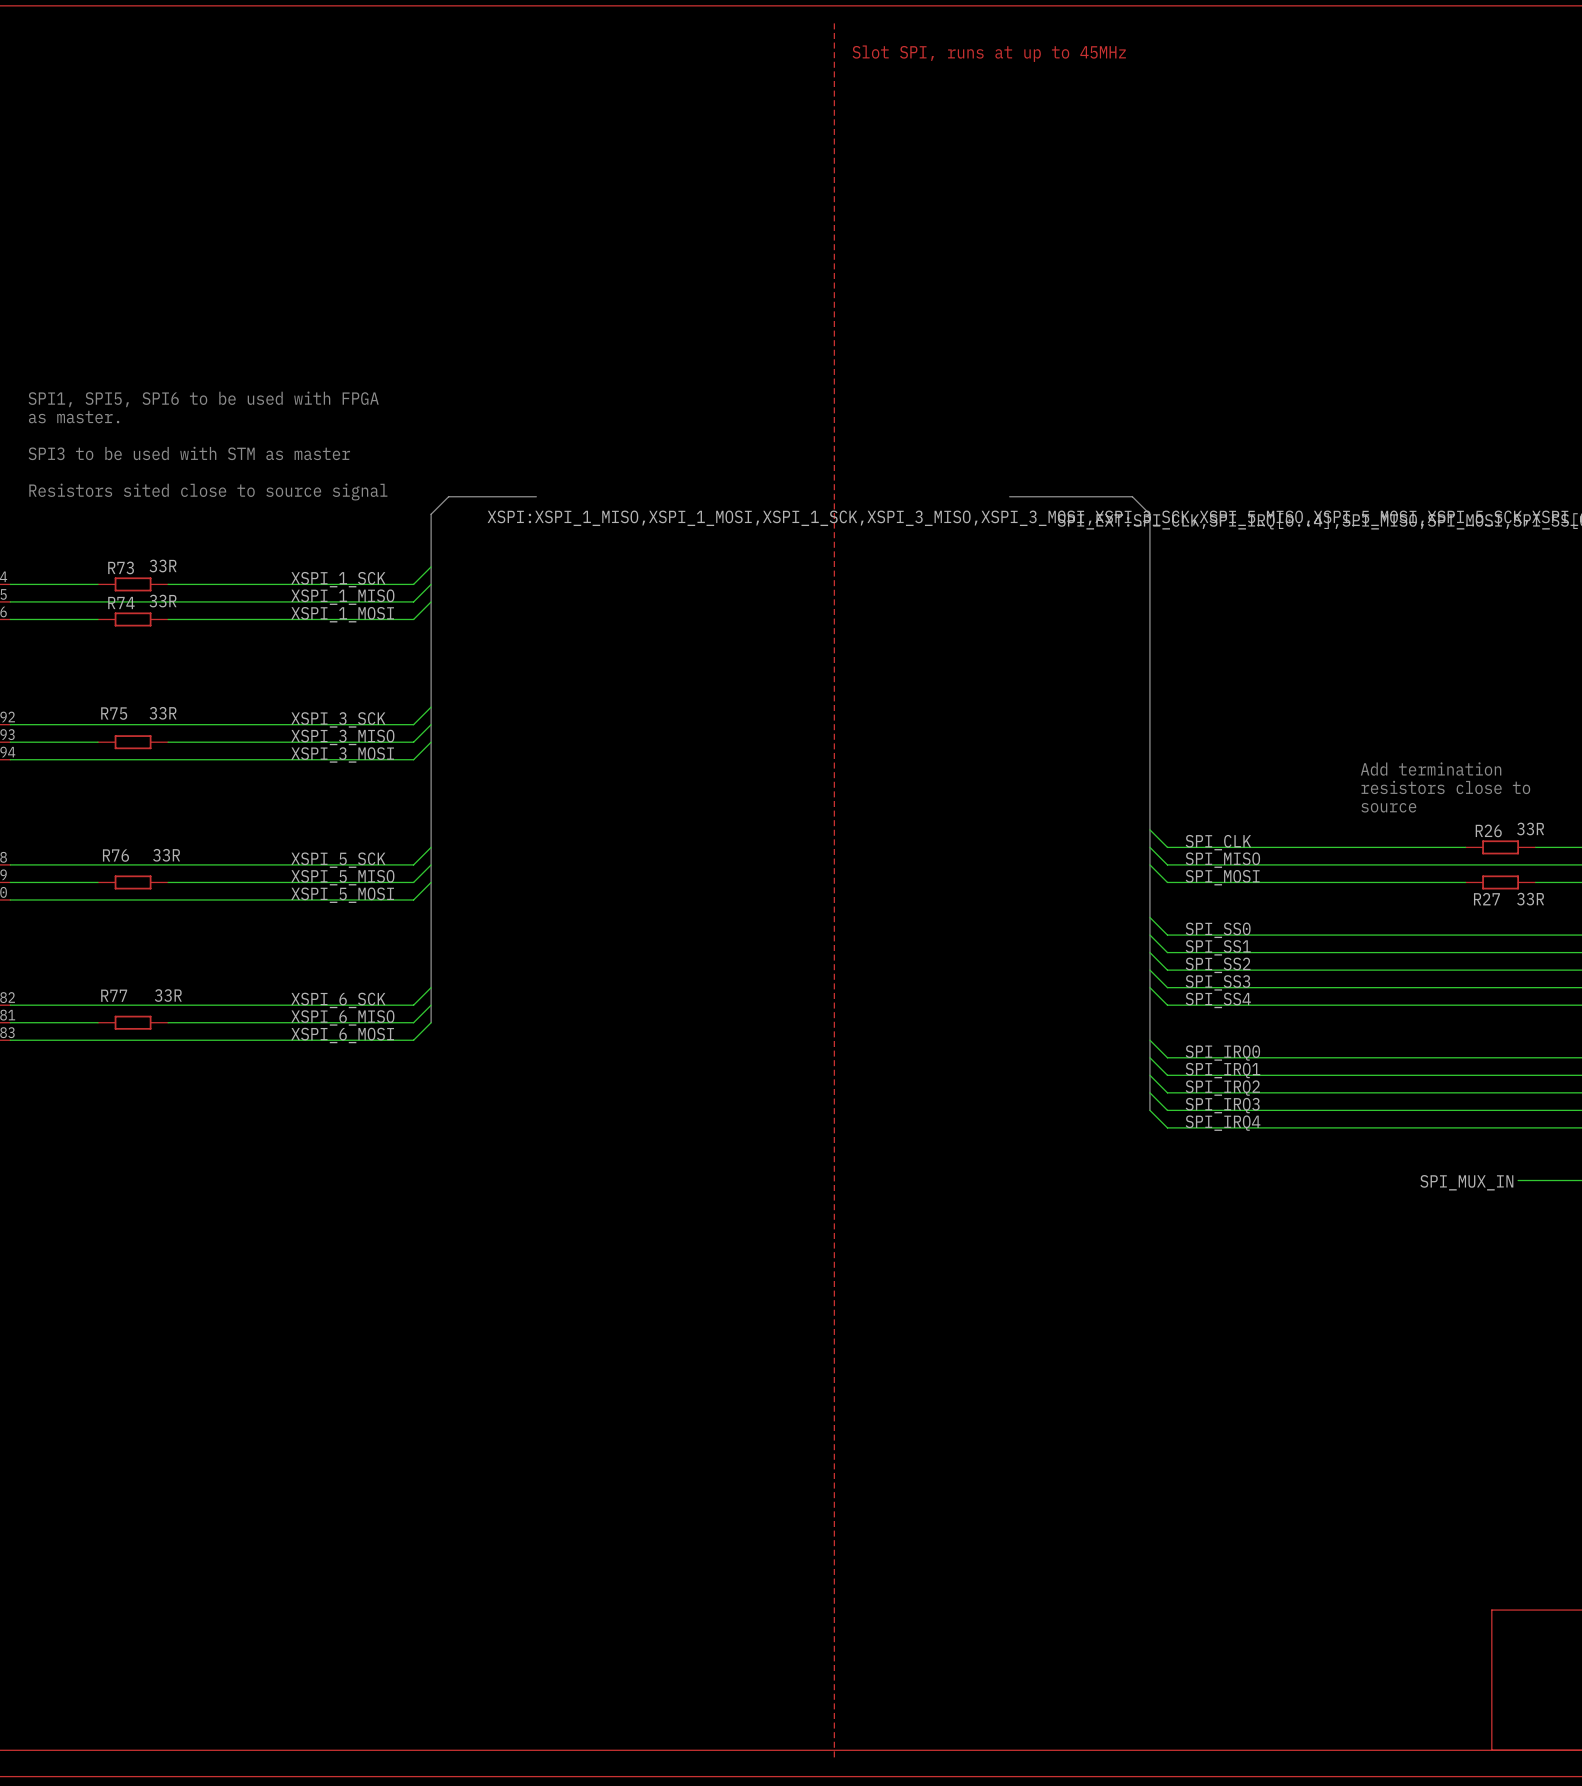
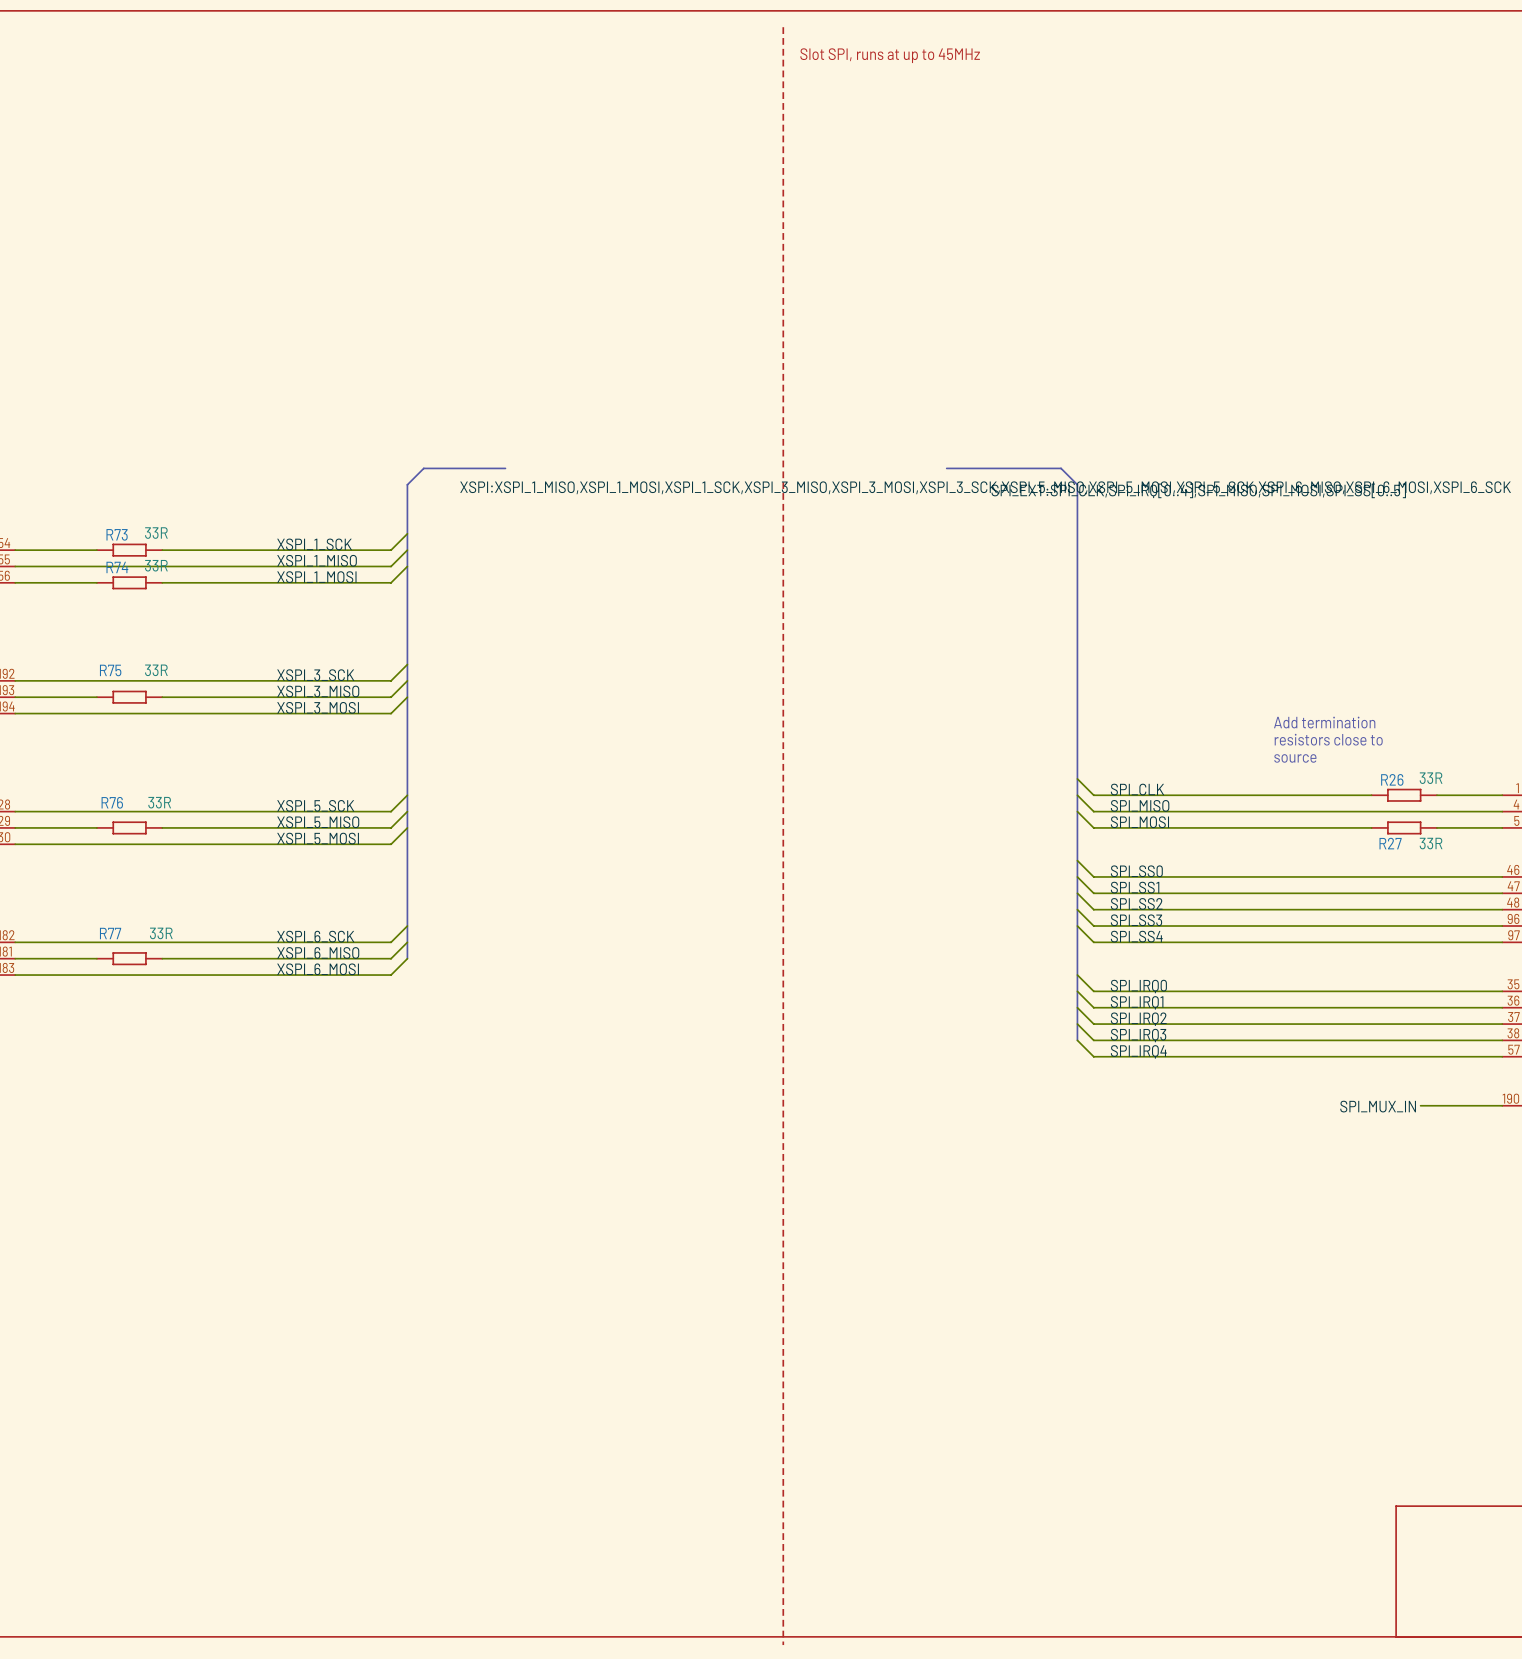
text: SPI1, SPI5, SPI6 to be used with FPGA (203, 399) -> none
text: as master. (74, 417) -> none
text: SPI3 to be used with STM as master (189, 453) -> none
text: Resistors sited close to source signal (208, 492) -> none

